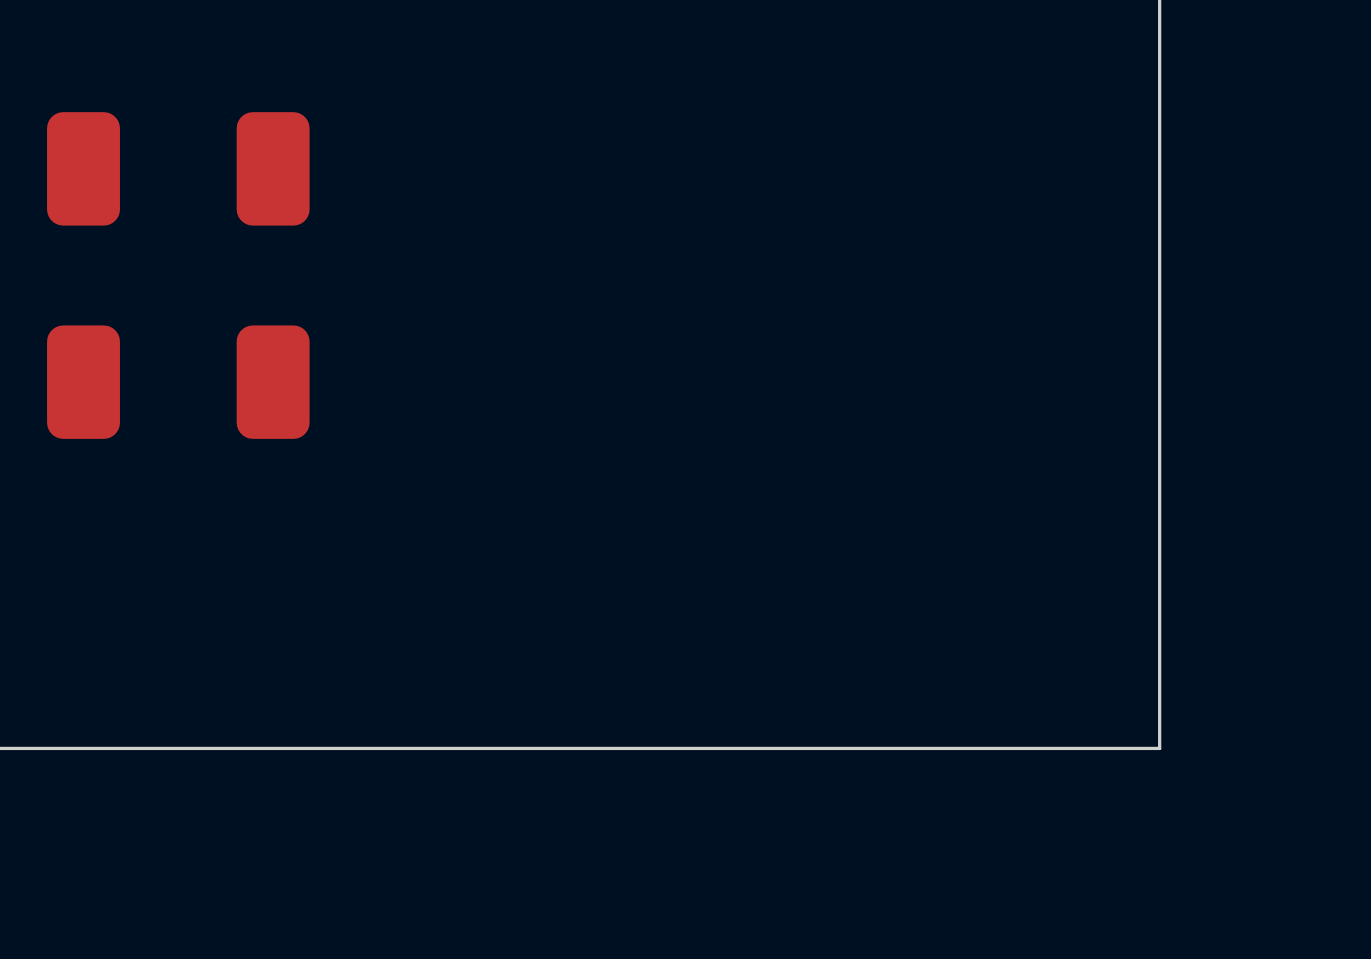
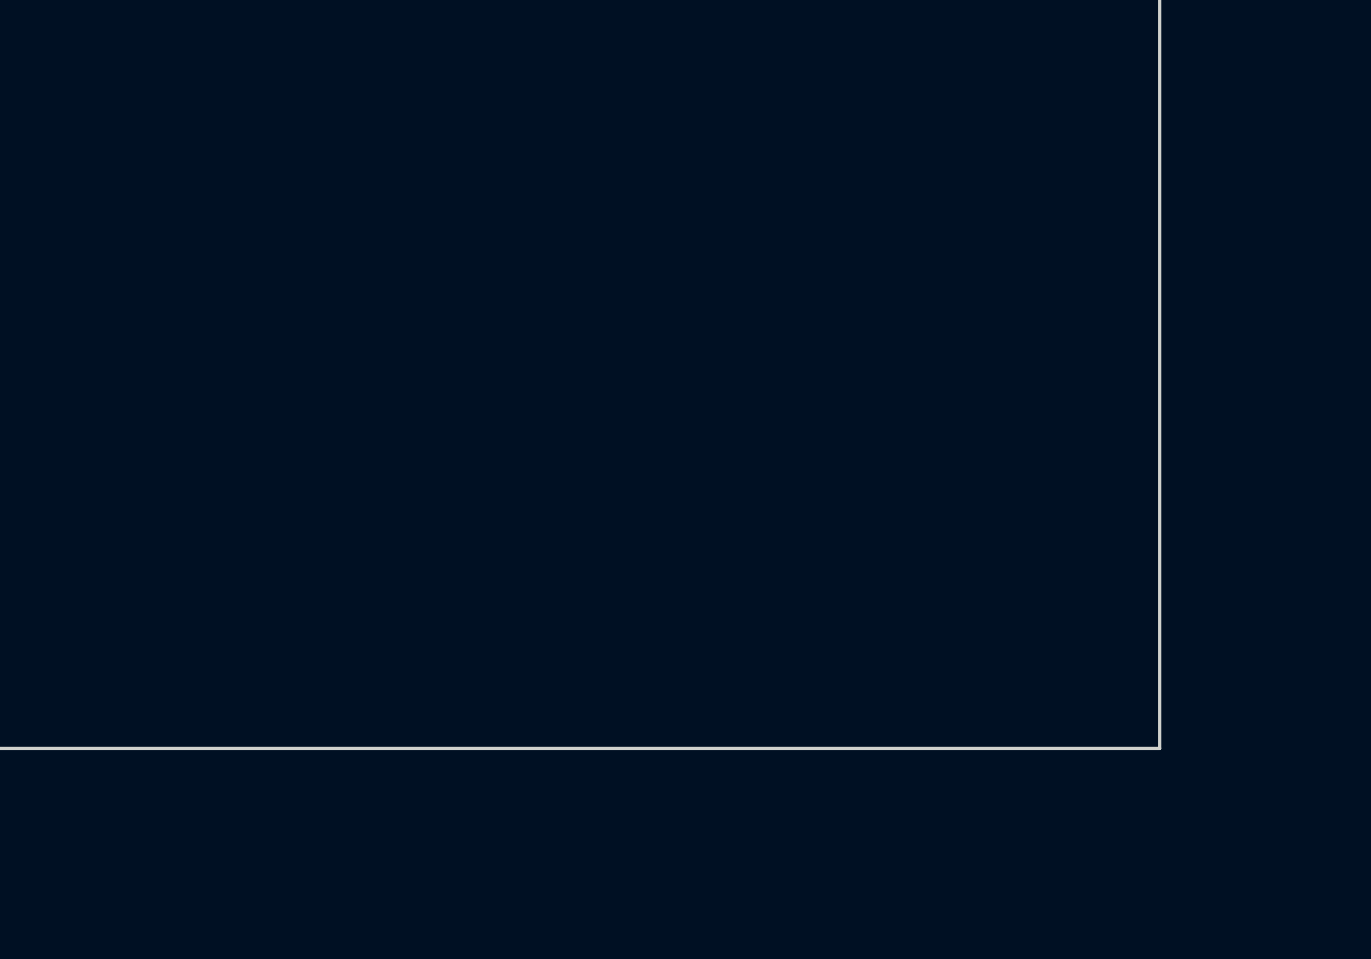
part: (178, 168) -> none
part: (178, 382) -> none

